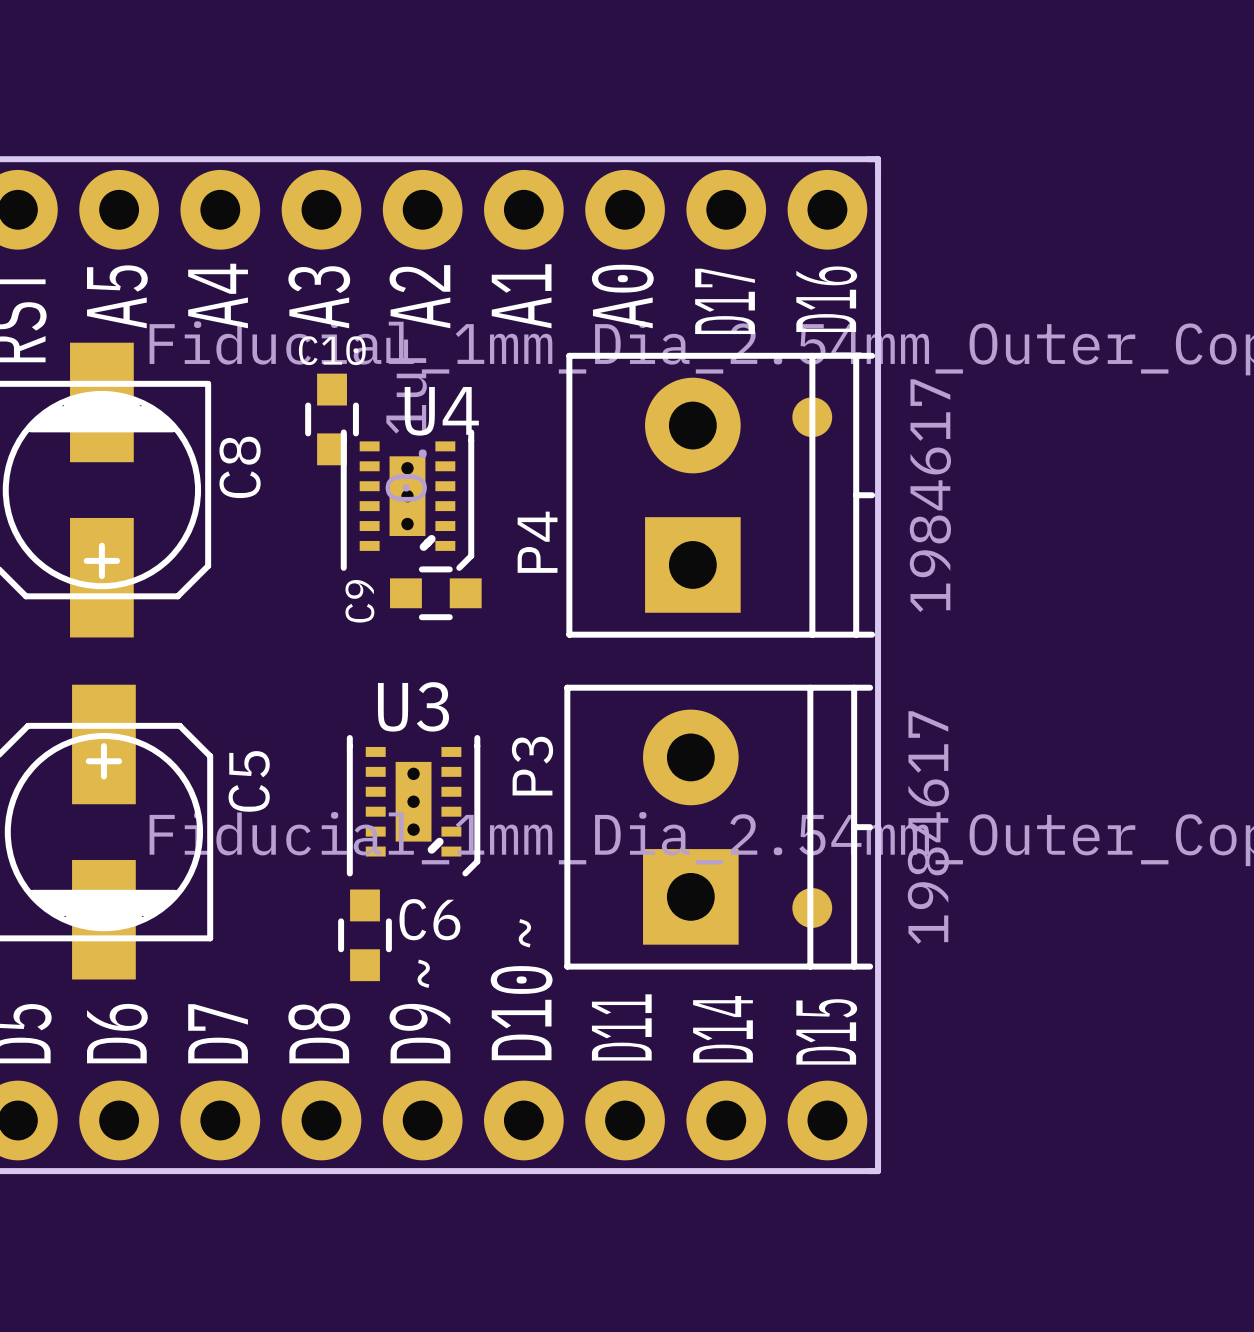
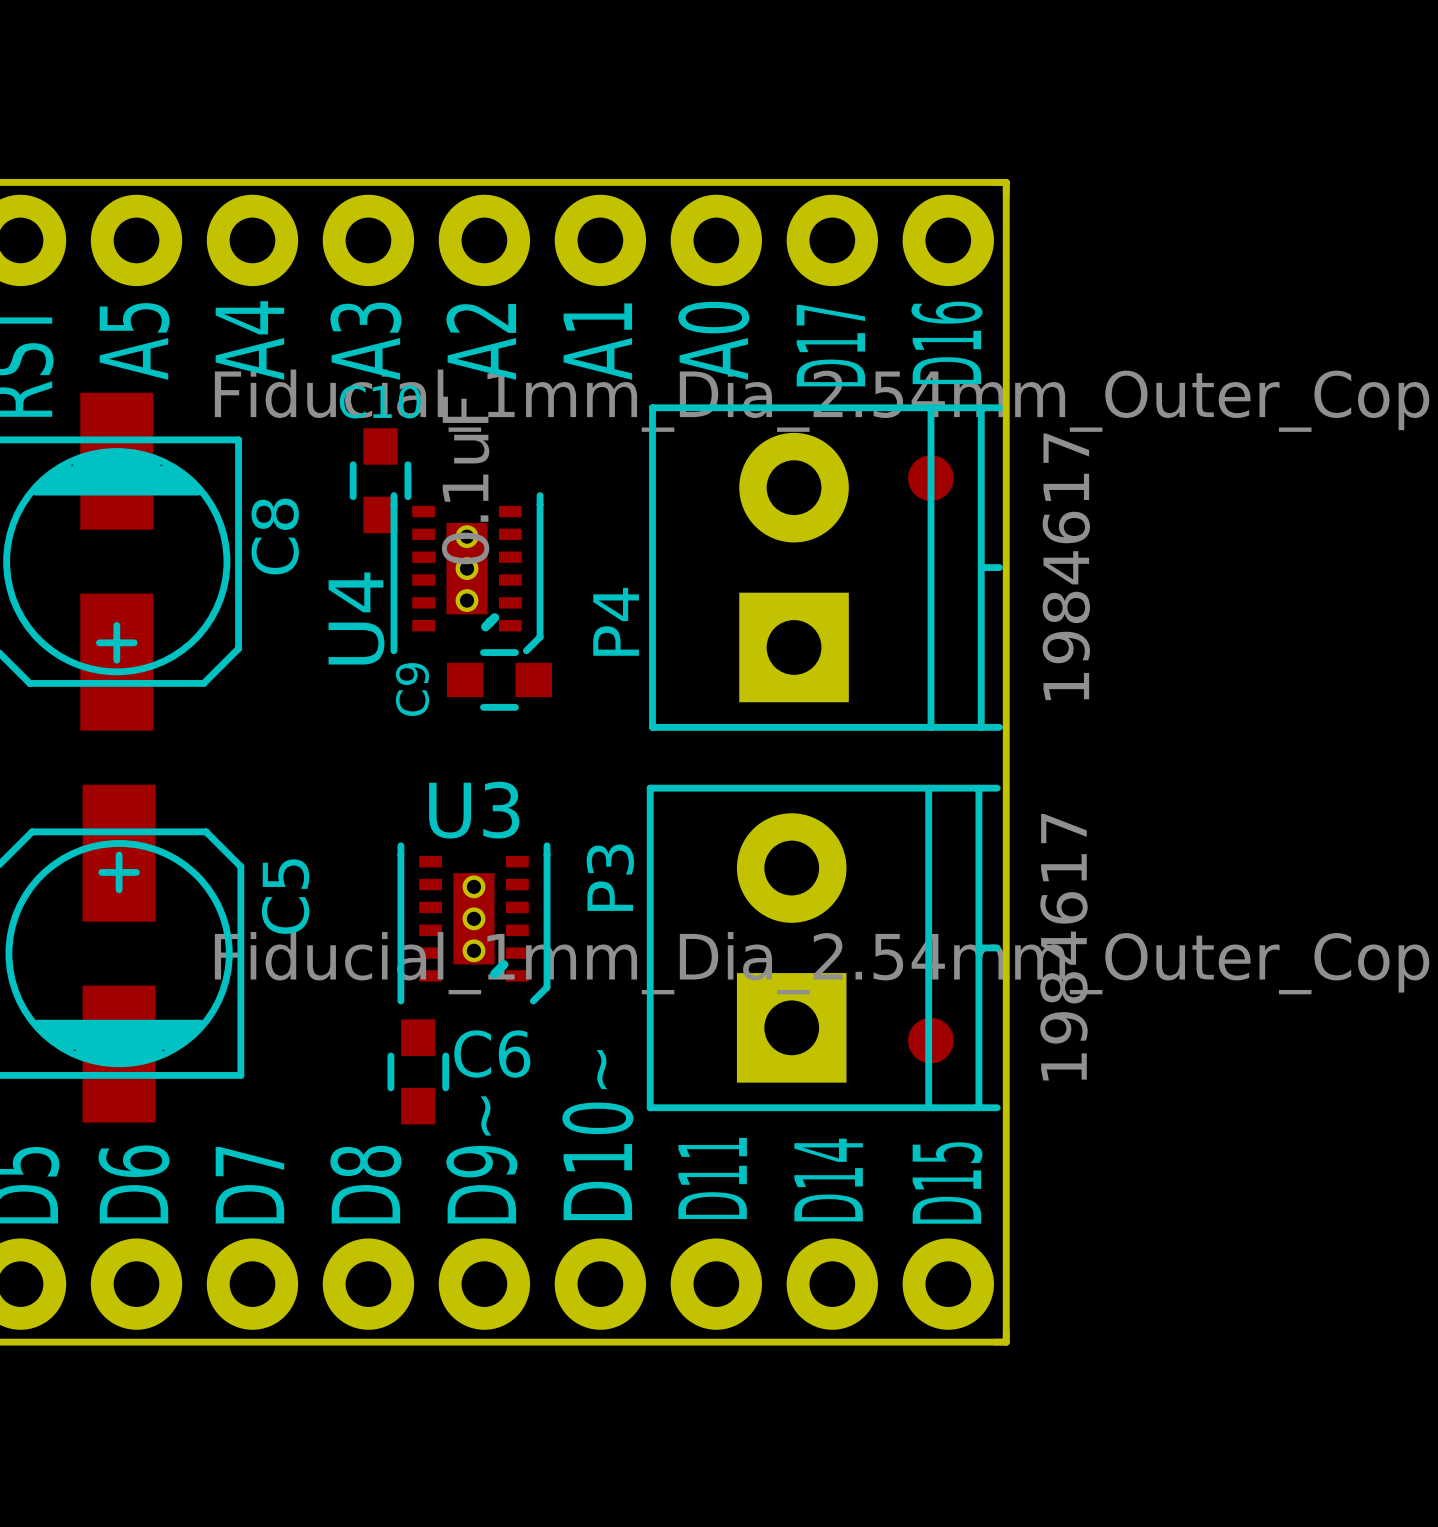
U4 name rotation: 0° (441, 411) -> 90° counterclockwise (356, 618)
U4 name position: U4 (441, 411) -> U4 (356, 618)

